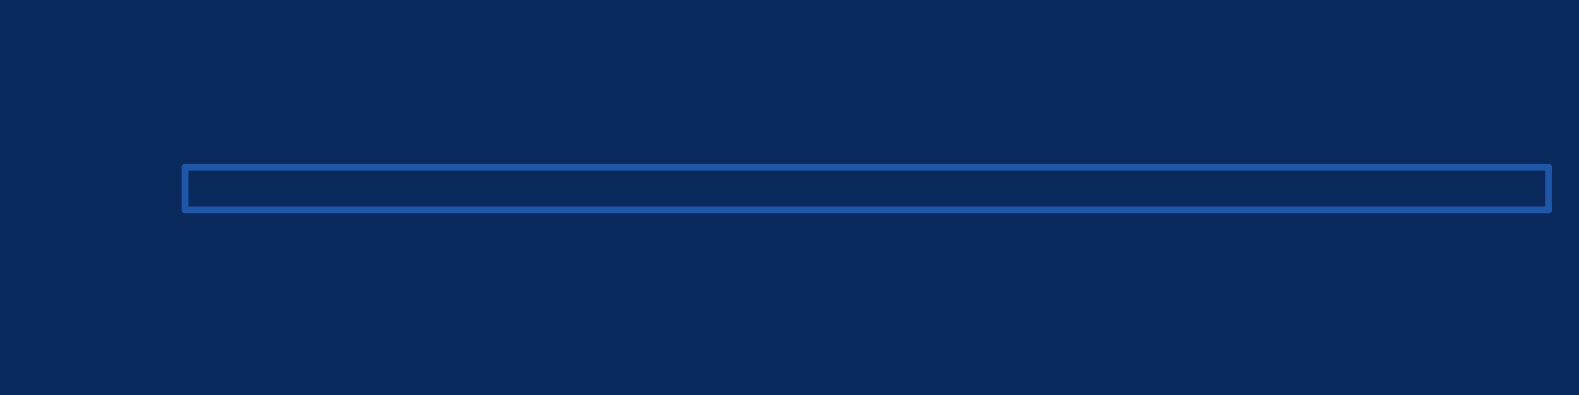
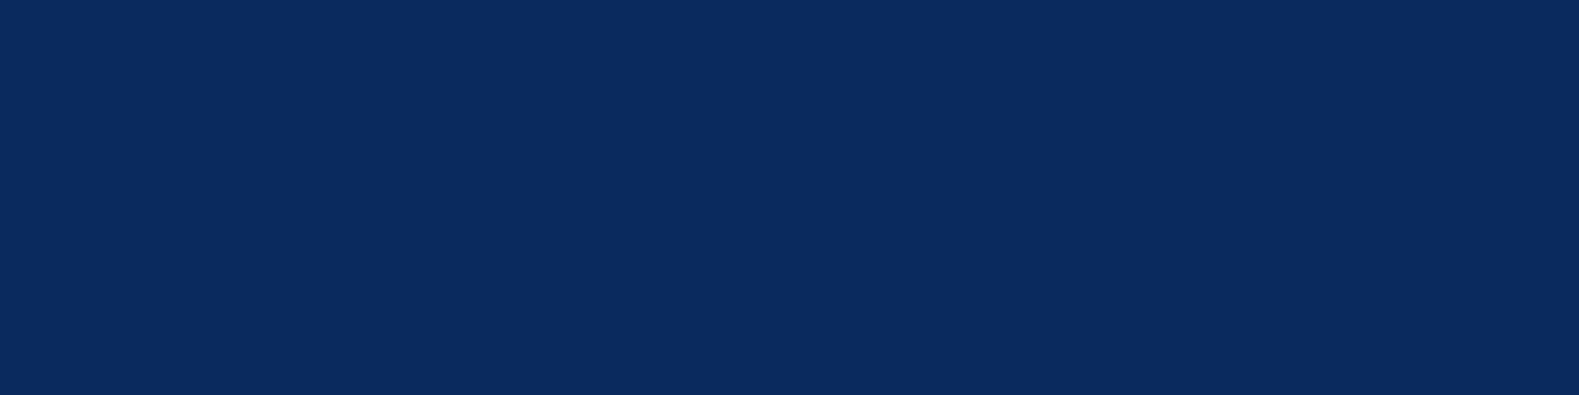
track: (185, 167) (1548, 167) (1548, 209) (185, 209) (185, 167) -> none

